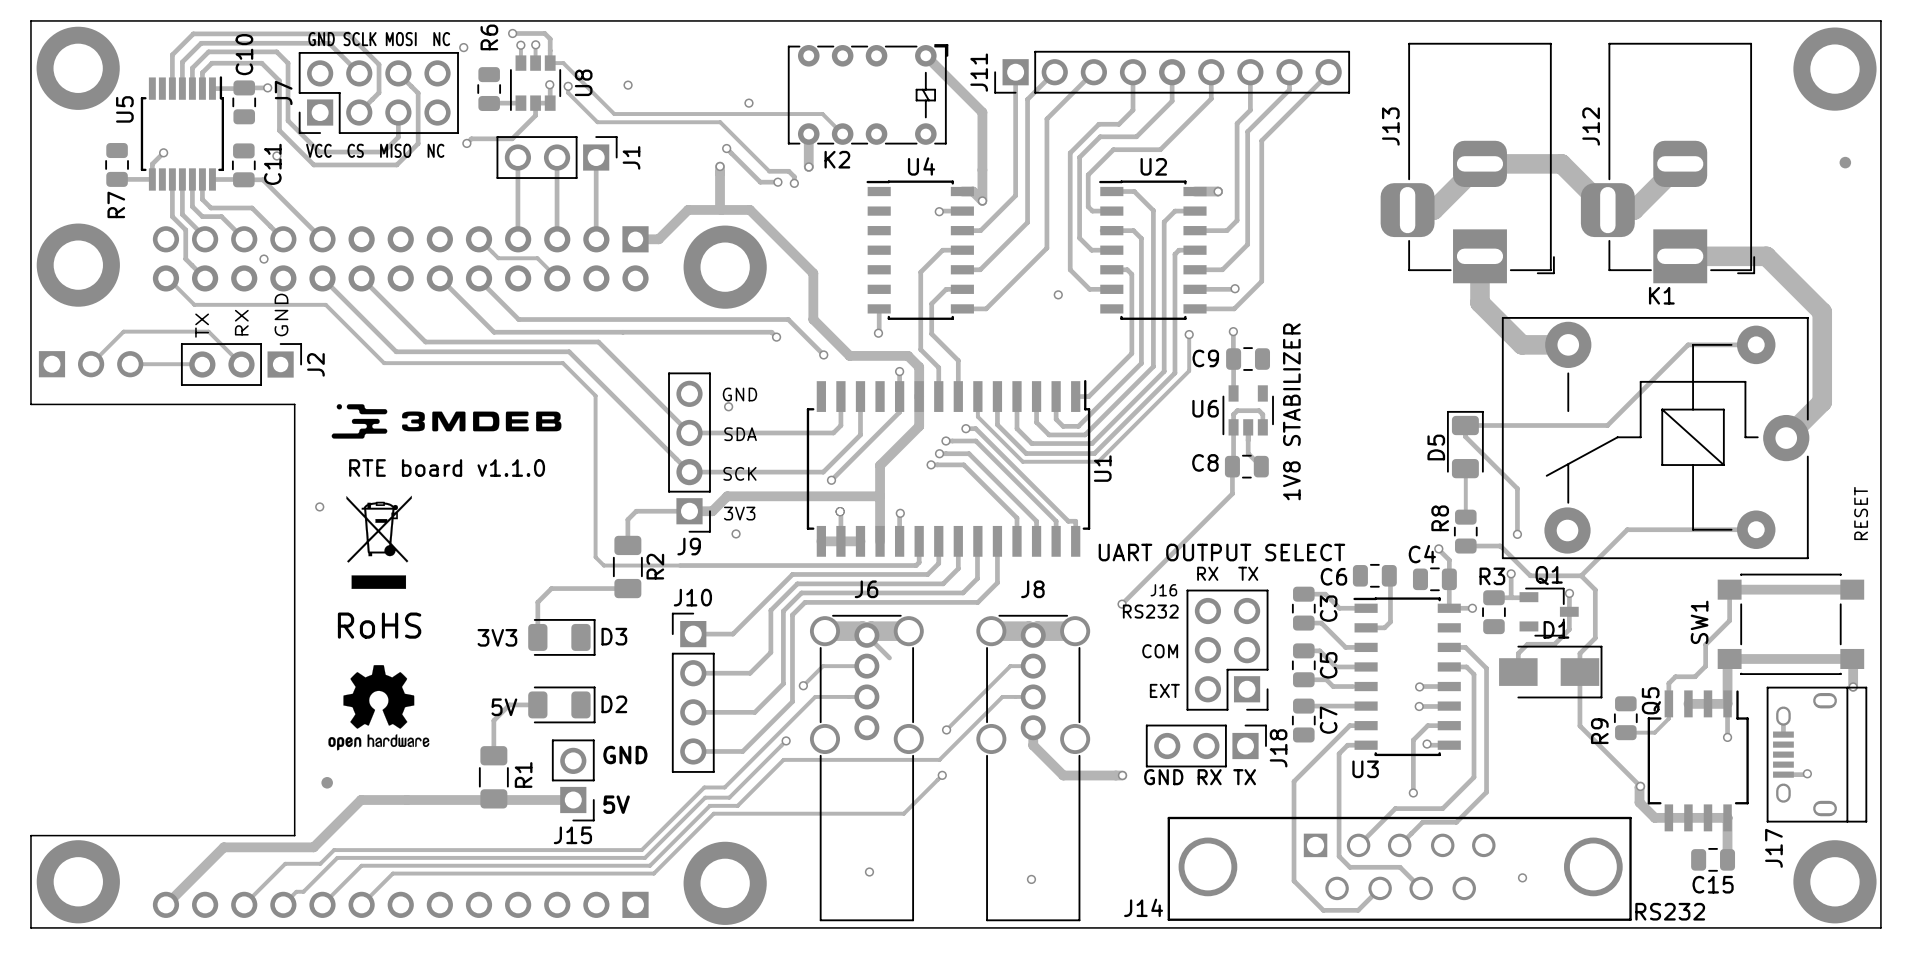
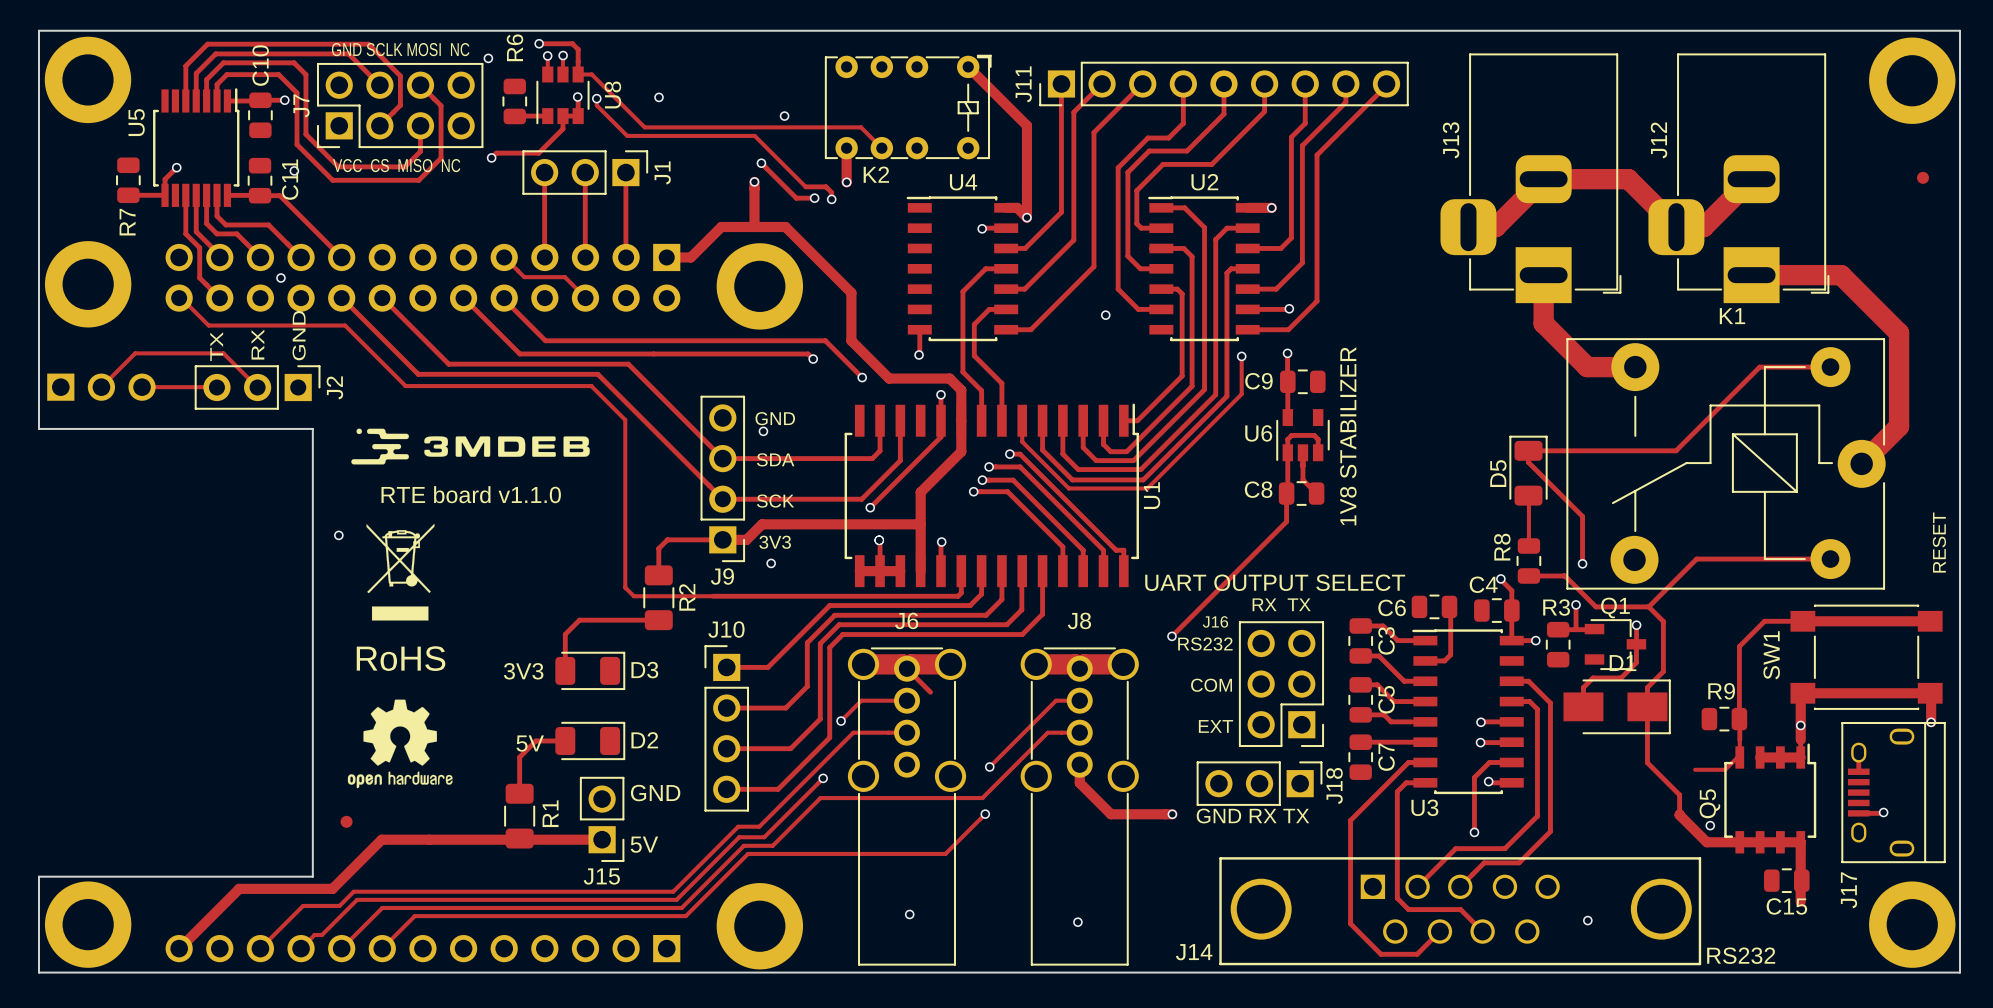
track: (1729, 589) (1729, 620) (1705, 644) (1705, 666) (1695, 676) (1675, 676) (1668, 684) -> (1802, 621) (1764, 621) (1739, 646) (1739, 719)
Q5 footprint: [1647, 690, 1749, 832] -> [1724, 743, 1817, 854]
Q5 name position: Q5 (1651, 700) -> Q5 (1709, 803)
track: (1688, 703) (1727, 703) -> none
R9 rotation: 0° (1625, 718) -> 90° clockwise (1724, 719)
R9 position: (1625, 718) -> (1724, 719)
track: (1727, 720) (1727, 737) -> (1800, 757) (1760, 757)
via position: (1727, 737) -> (1800, 725)
track: (1610, 756) (1640, 786) (1639, 802) (1654, 817) (1727, 817) -> (1679, 794) (1679, 815) (1706, 842) (1800, 842) (1800, 858)
C15 position: (1713, 859) -> (1786, 880)

